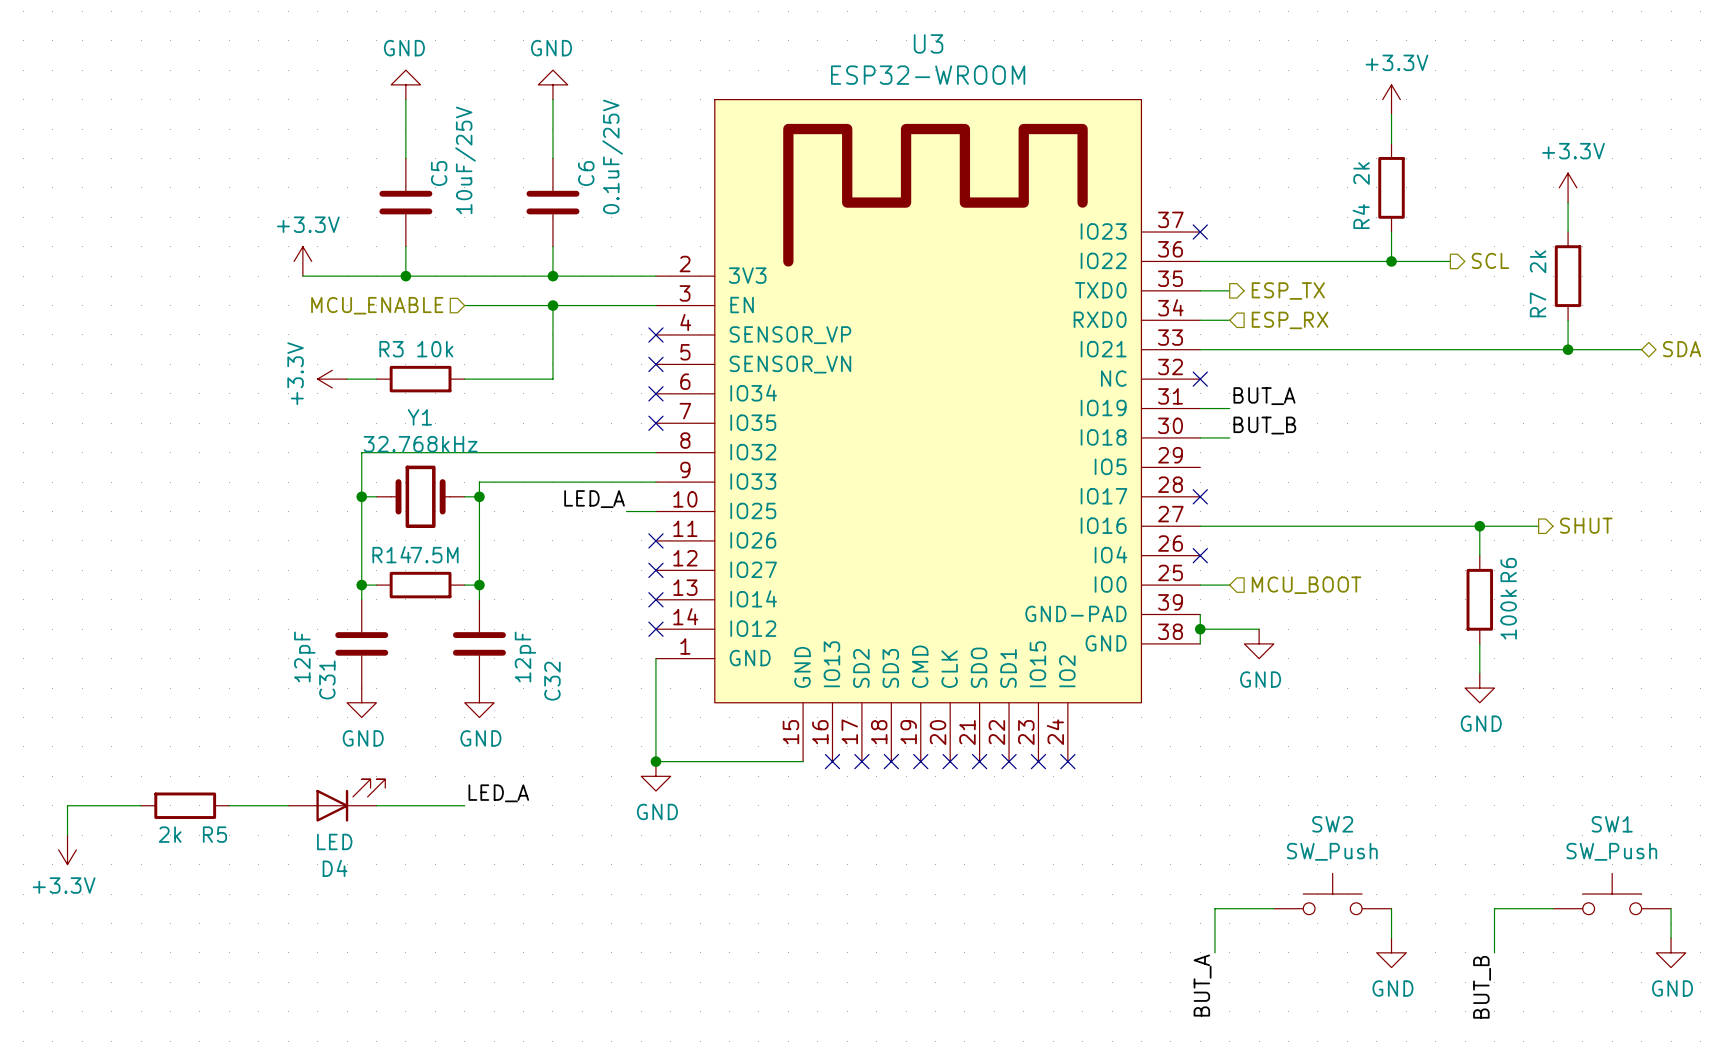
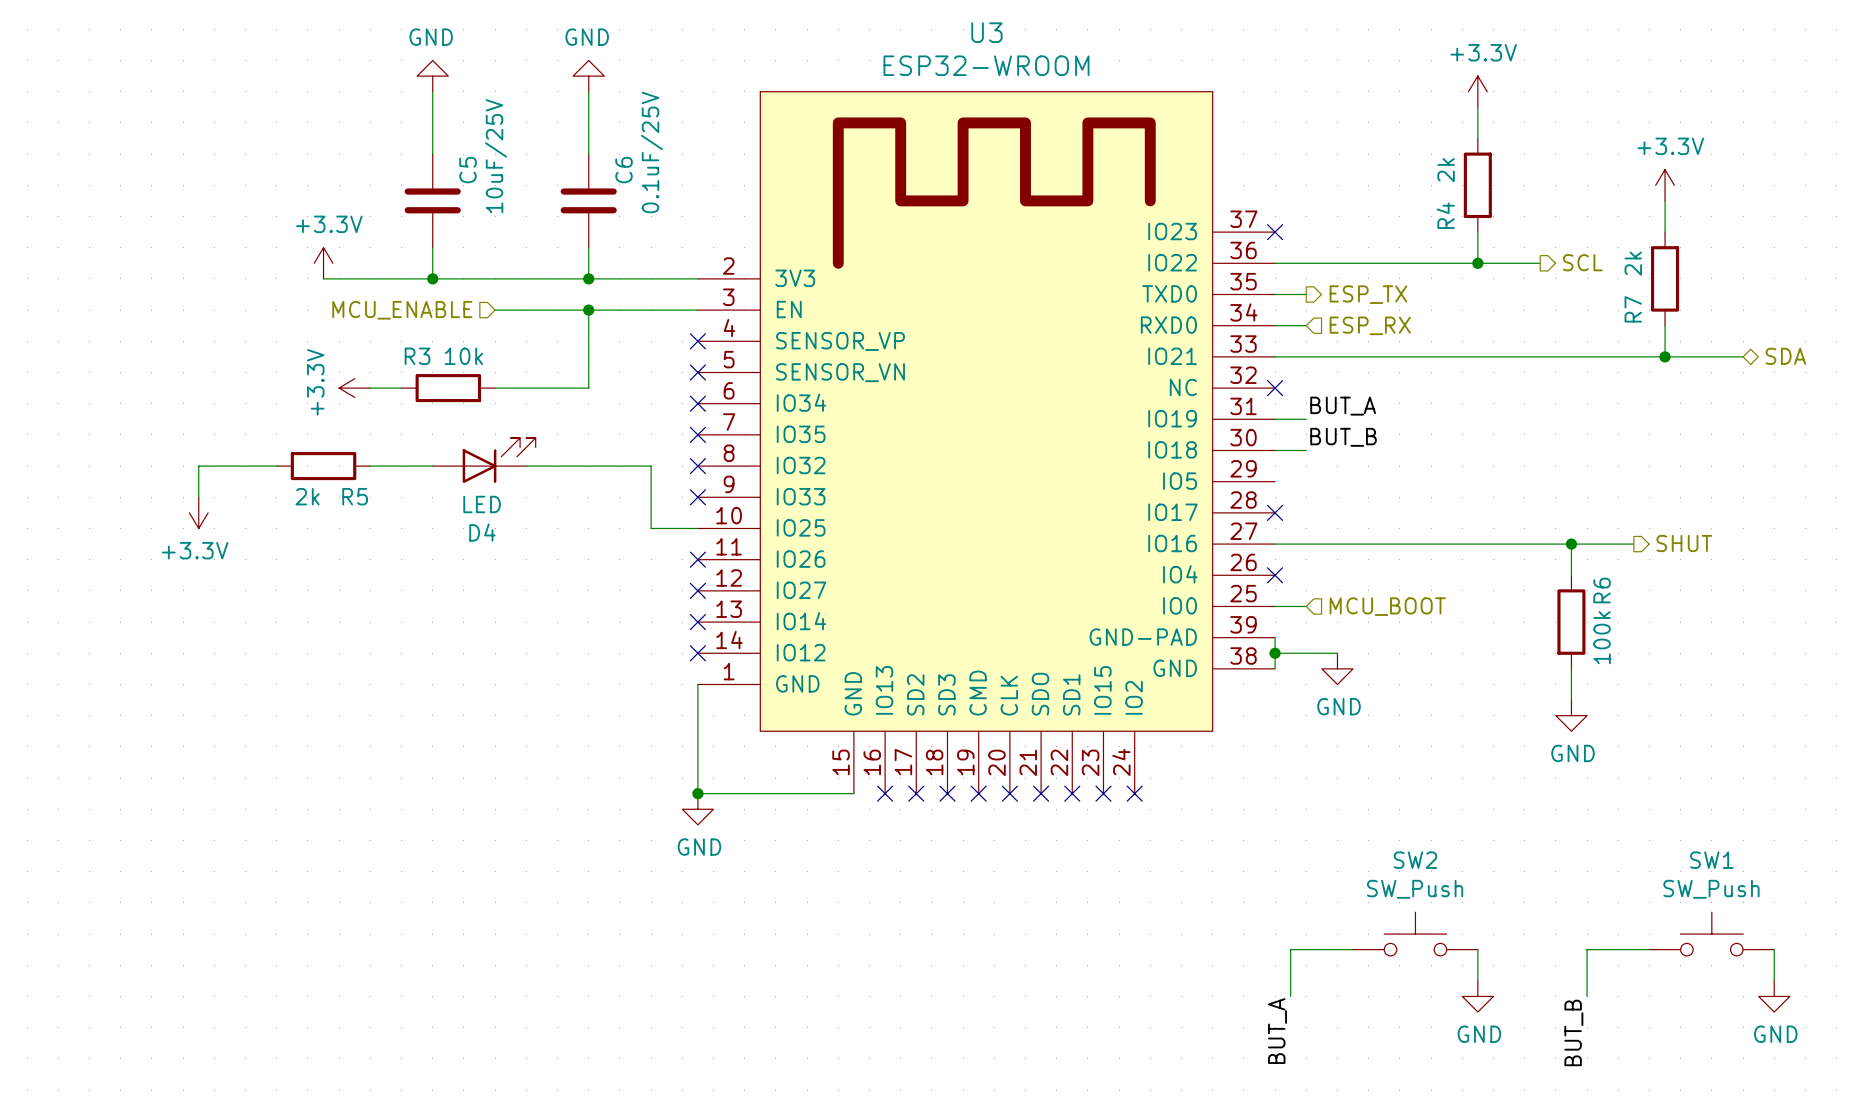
wire: none -> (276, 466) (198, 466) (198, 497)
wire: (361, 452) (361, 599) -> (385, 466) (370, 466)
wire: (611, 452) (655, 452) -> (651, 466) (651, 528) (666, 528)
no-connect mark: none -> (697, 466)
wire: (655, 482) (479, 482) (479, 599) -> none
no-connect mark: none -> (697, 497)
power symbol: none -> +3.3V (198, 512)
wire: (361, 496) (376, 496) -> none
junction: (361, 496) -> none
Y1: 32.768kHz (420, 496) -> none
wire: (464, 496) (479, 496) -> none
junction: (479, 496) -> none
label: LED_A (594, 499) -> none
wire: (361, 585) (376, 585) -> none
junction: (361, 585) -> none
R14: 7.5M (420, 585) -> none
wire: (464, 585) (479, 585) -> none
junction: (479, 585) -> none
C31: 12pF (361, 643) -> none
C32: 12pF (479, 643) -> none
power symbol: GND (361, 702) -> none
power symbol: GND (479, 702) -> none
label: LED_A (498, 793) -> none
D4 position: (336, 800) -> (484, 460)
wire: (141, 805) (67, 805) (67, 835) -> none
R5 position: (185, 805) -> (323, 466)
wire: (229, 805) (288, 805) -> none
wire: (376, 805) (464, 805) -> none
power symbol: +3.3V (67, 849) -> none

